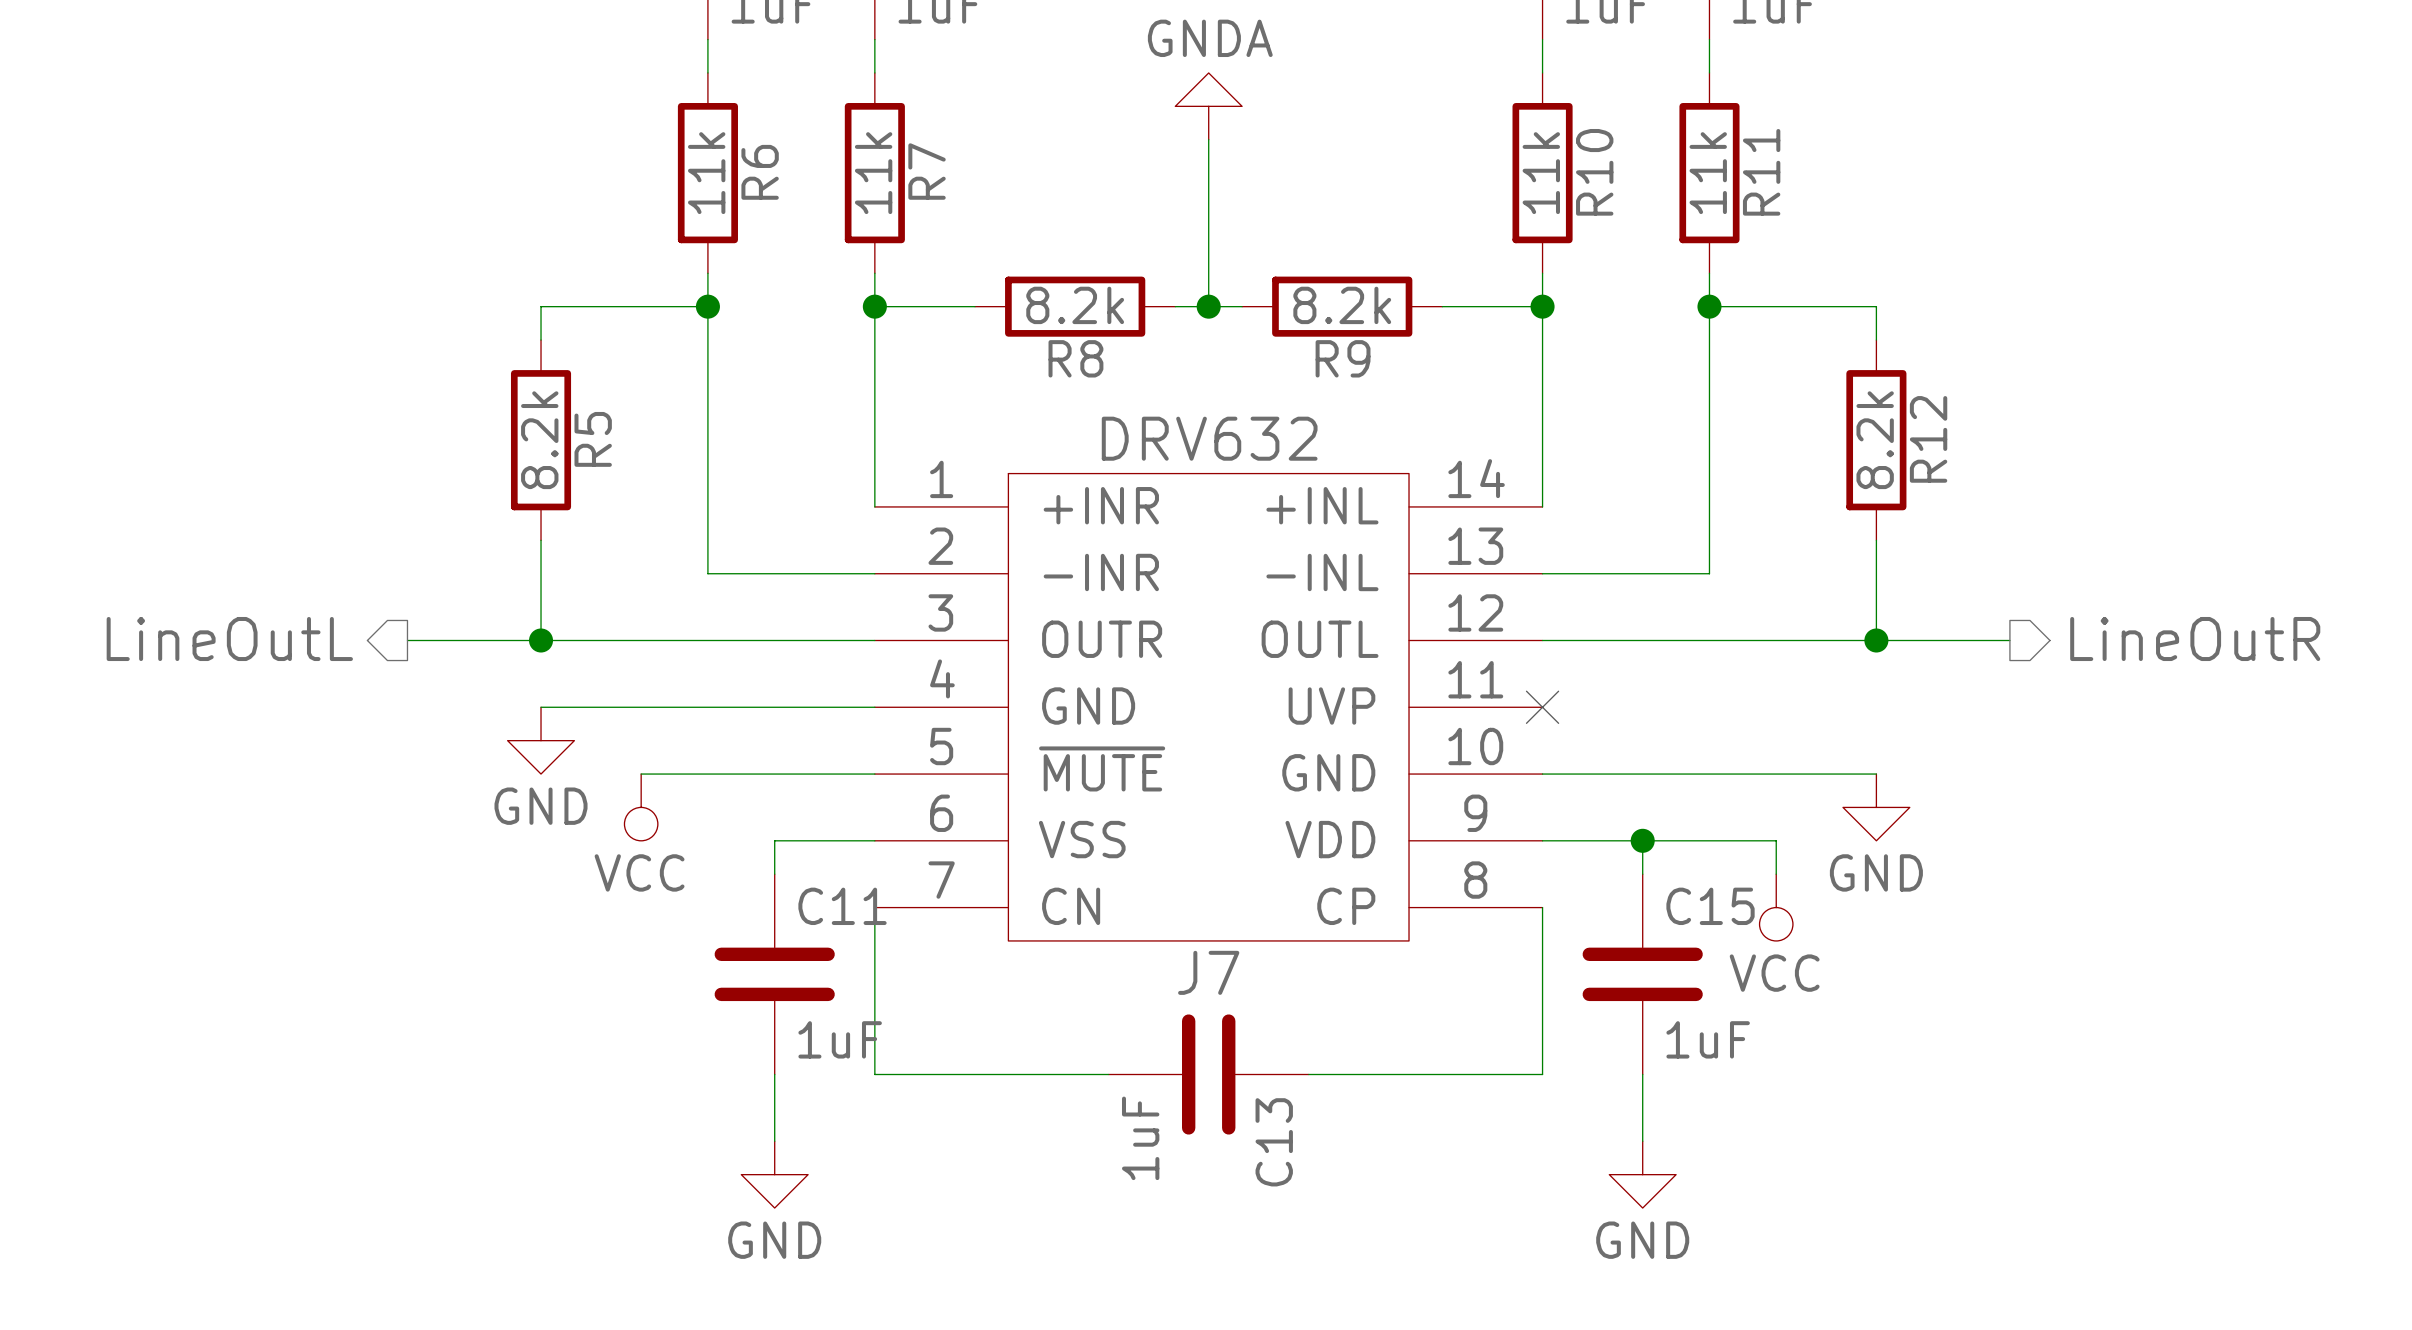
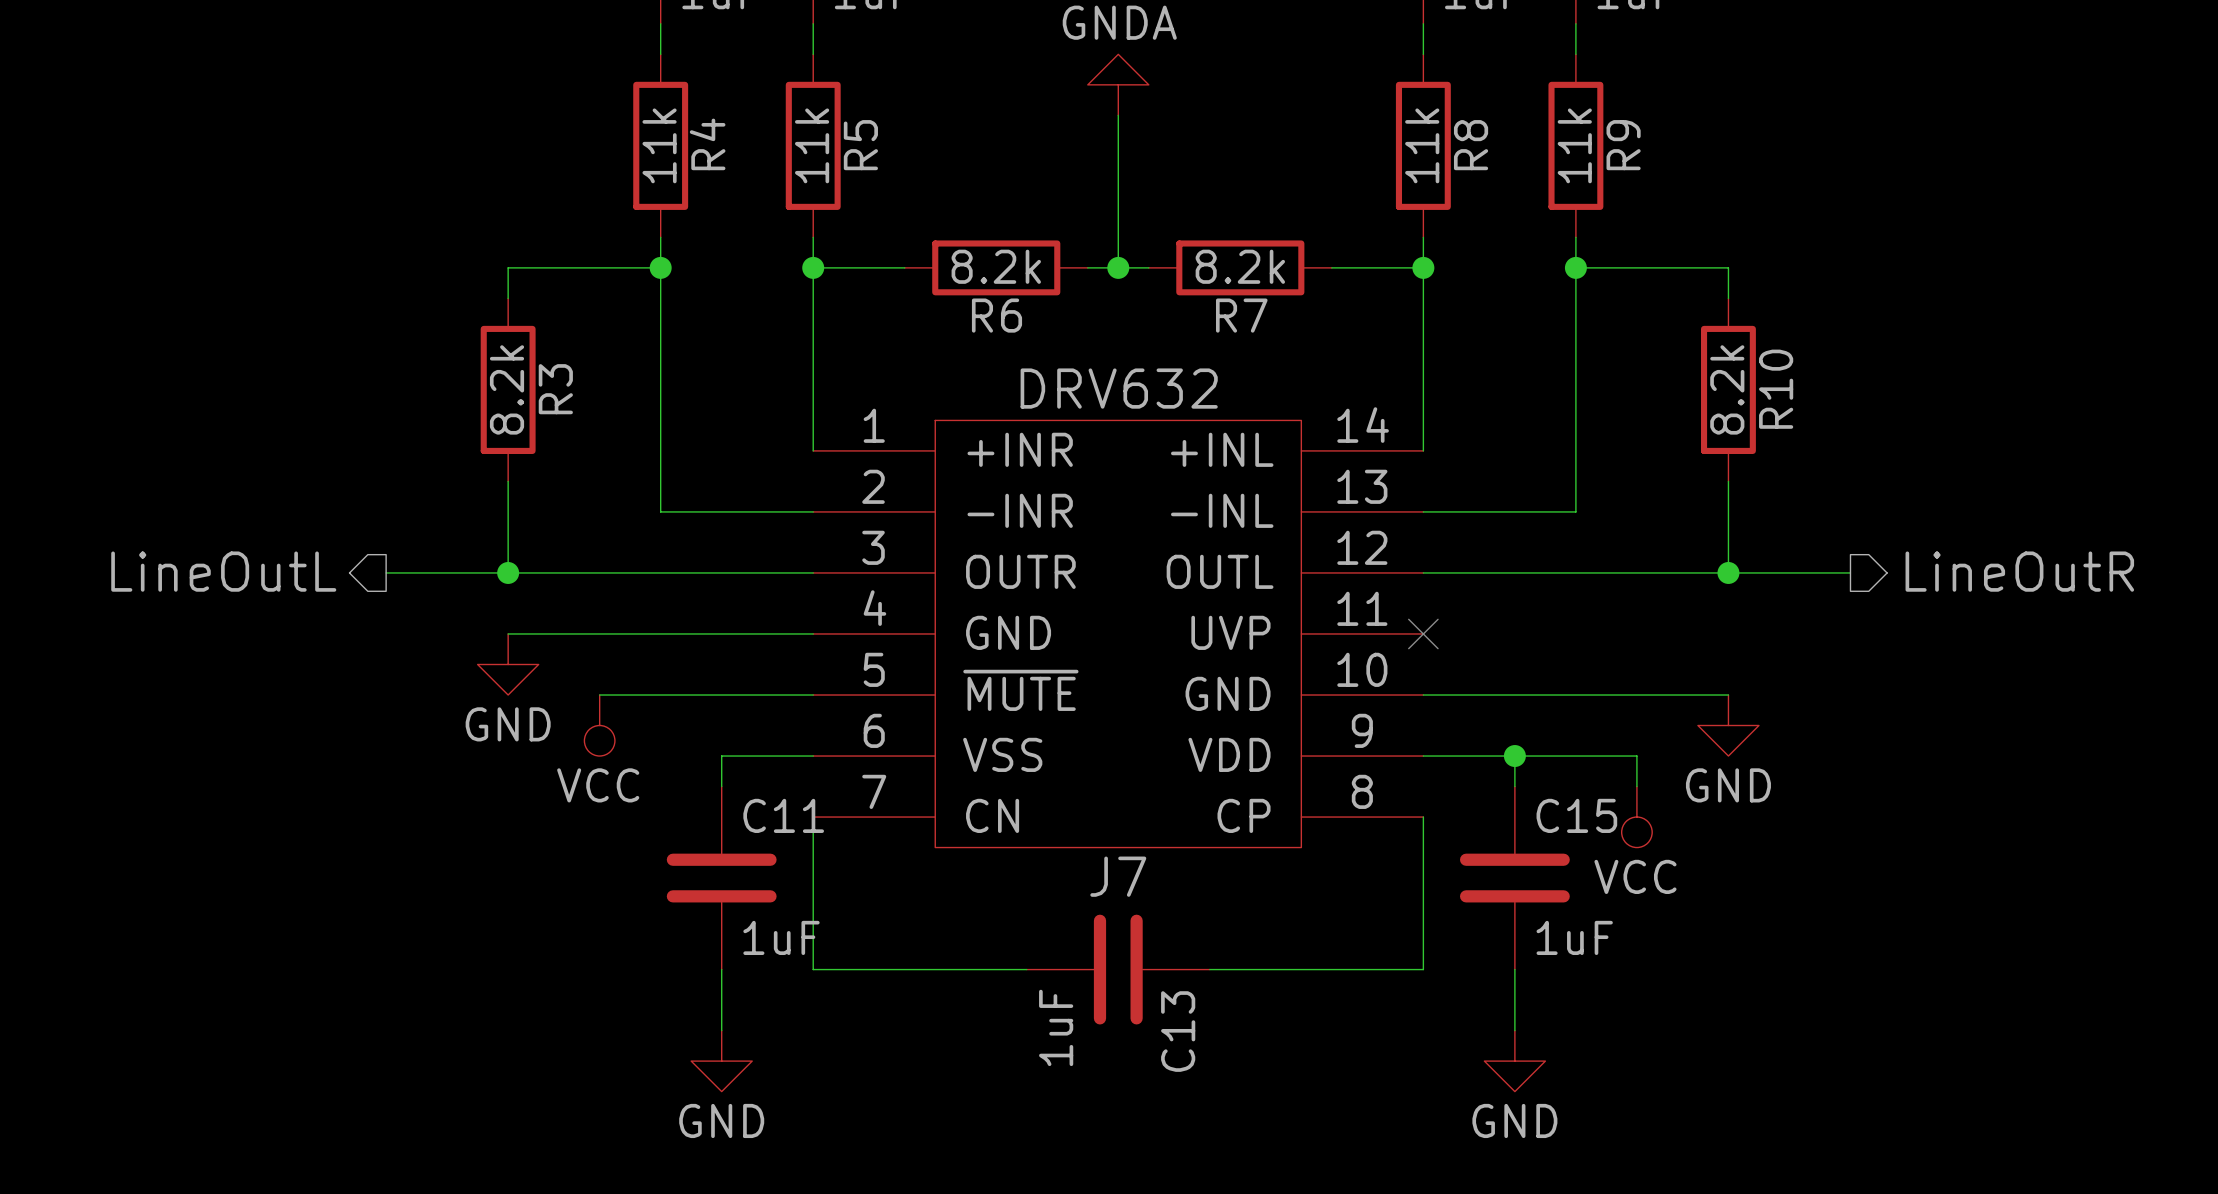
R7 name: R7 (927, 171) -> R5 (860, 145)
R6 name: R6 (760, 172) -> R4 (707, 144)
R10 name: R10 (1594, 172) -> R8 (1471, 145)
R11 name: R11 (1761, 172) -> R9 (1623, 145)
R8 name: R8 (1075, 358) -> R6 (996, 315)
R9 name: R9 (1343, 358) -> R7 (1241, 315)
R5 name: R5 (593, 439) -> R3 (555, 389)
R12 name: R12 (1928, 439) -> R10 (1776, 389)

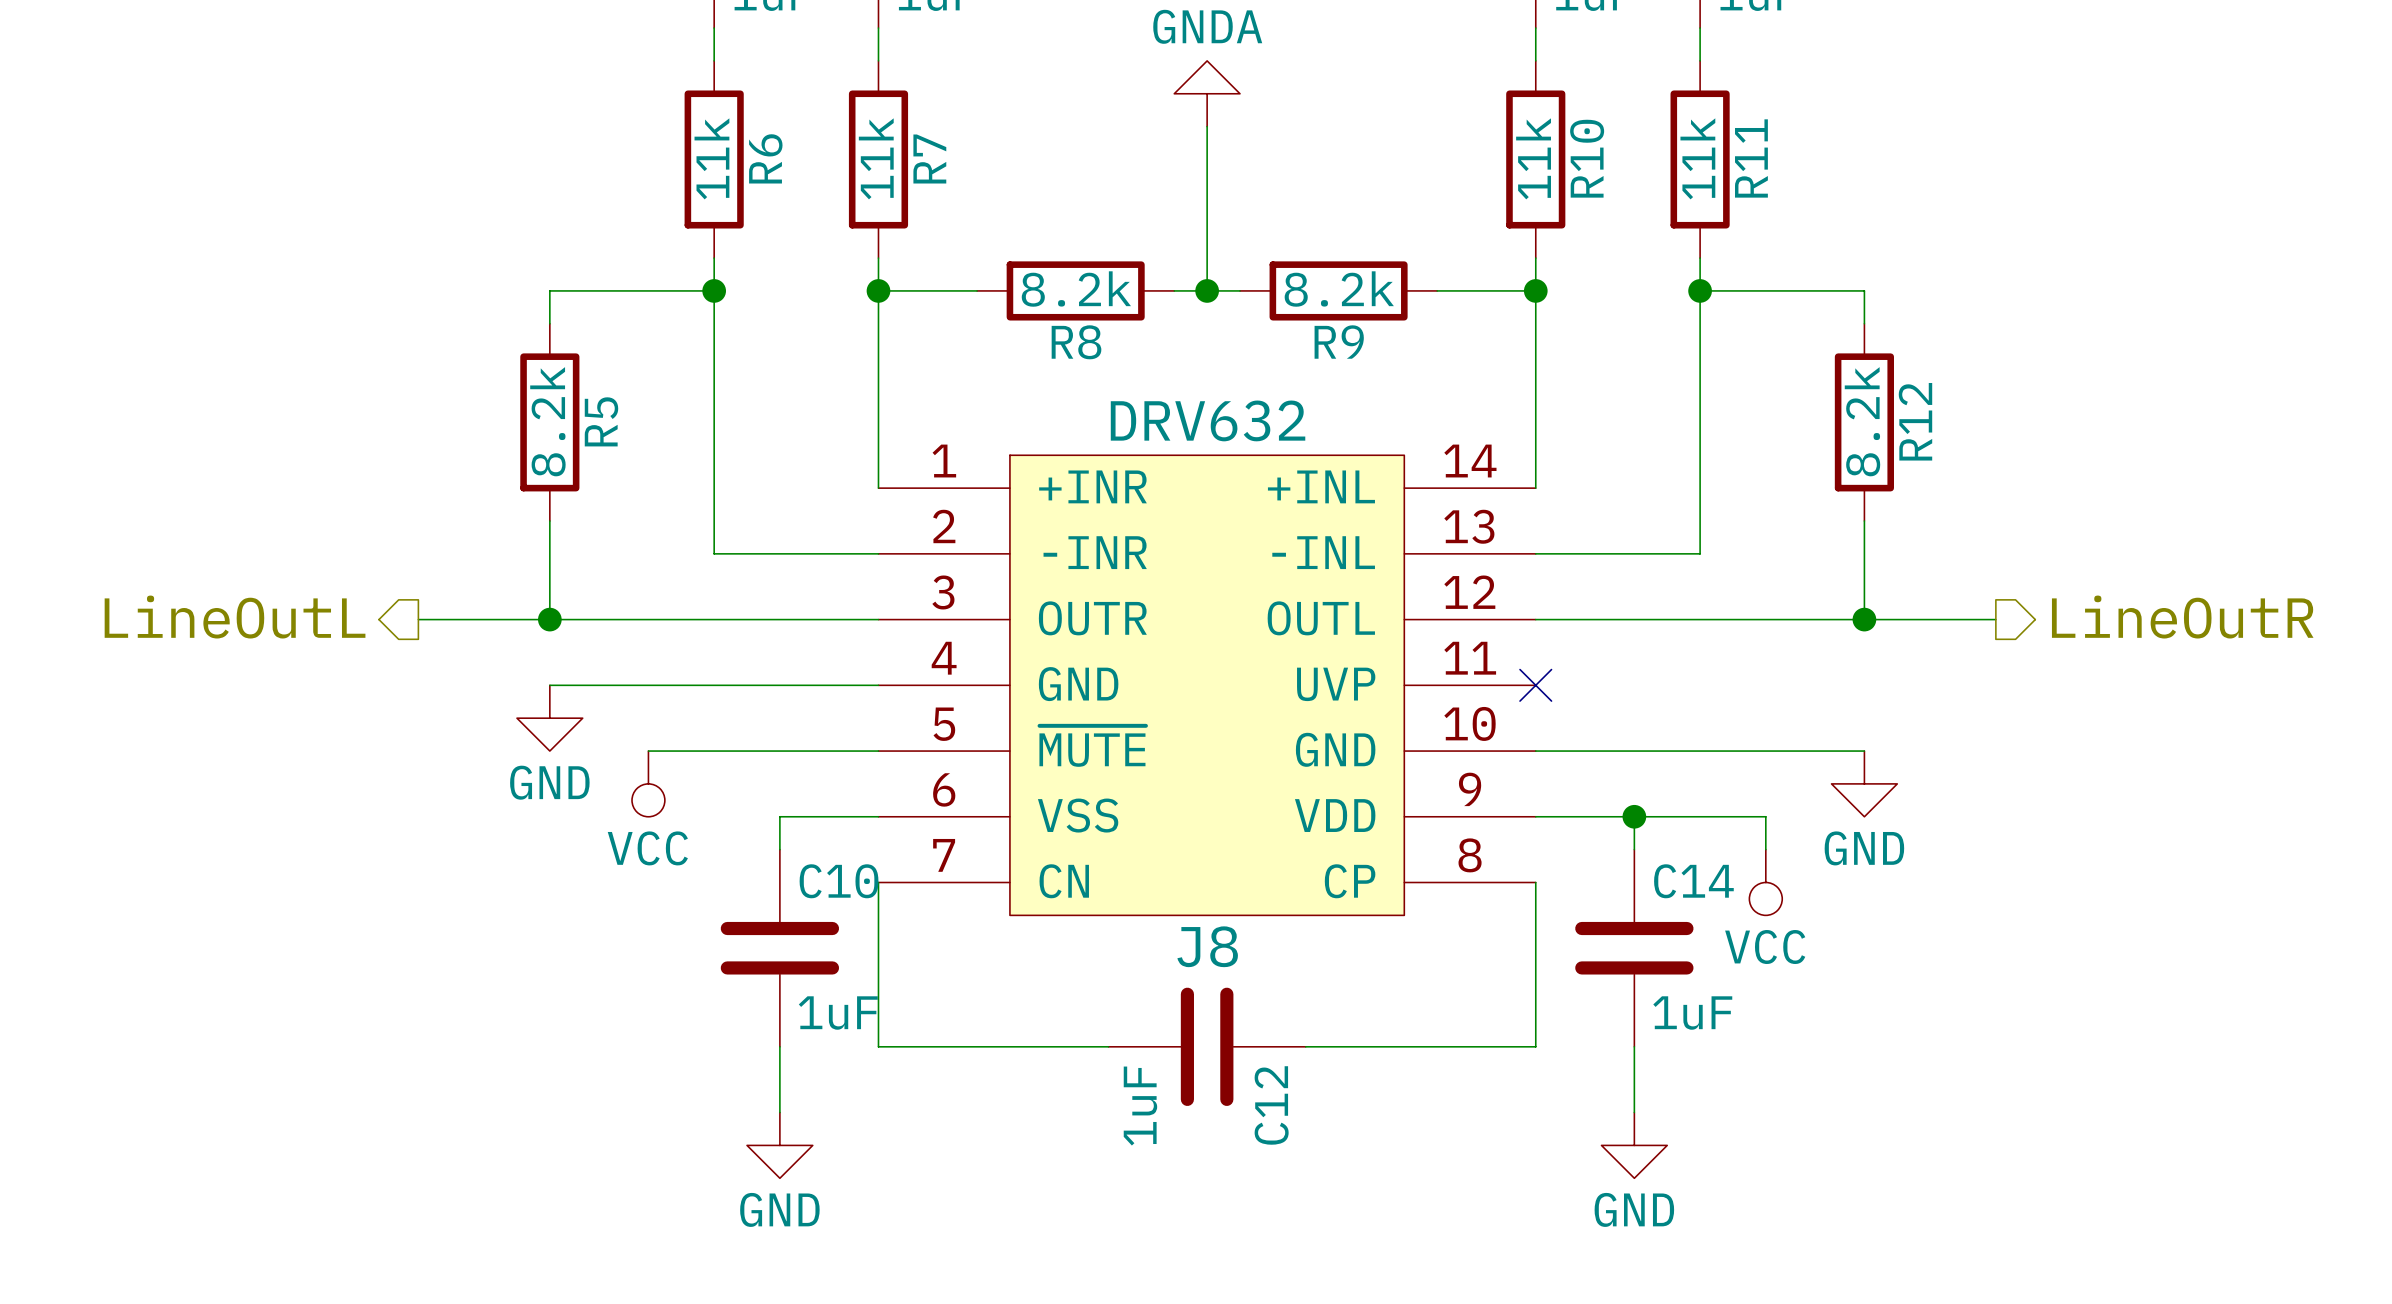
R4 name: R4 (707, 144) -> R6 (765, 158)
R5 name: R5 (860, 145) -> R7 (929, 159)
R8 name: R8 (1471, 145) -> R10 (1587, 158)
R9 name: R9 (1623, 145) -> R11 (1751, 158)
R6 name: R6 (996, 315) -> R8 (1076, 342)
R7 name: R7 (1241, 315) -> R9 (1339, 342)
R3 name: R3 (555, 389) -> R5 (601, 421)
R10 name: R10 (1776, 389) -> R12 (1915, 421)
C11 name: C11 (783, 815) -> C10 (839, 881)
C15 name: C15 (1576, 815) -> C14 (1693, 881)
J7 name: J7 (1118, 876) -> J8 (1207, 946)
C13 name: C13 (1178, 1031) -> C12 (1271, 1105)

